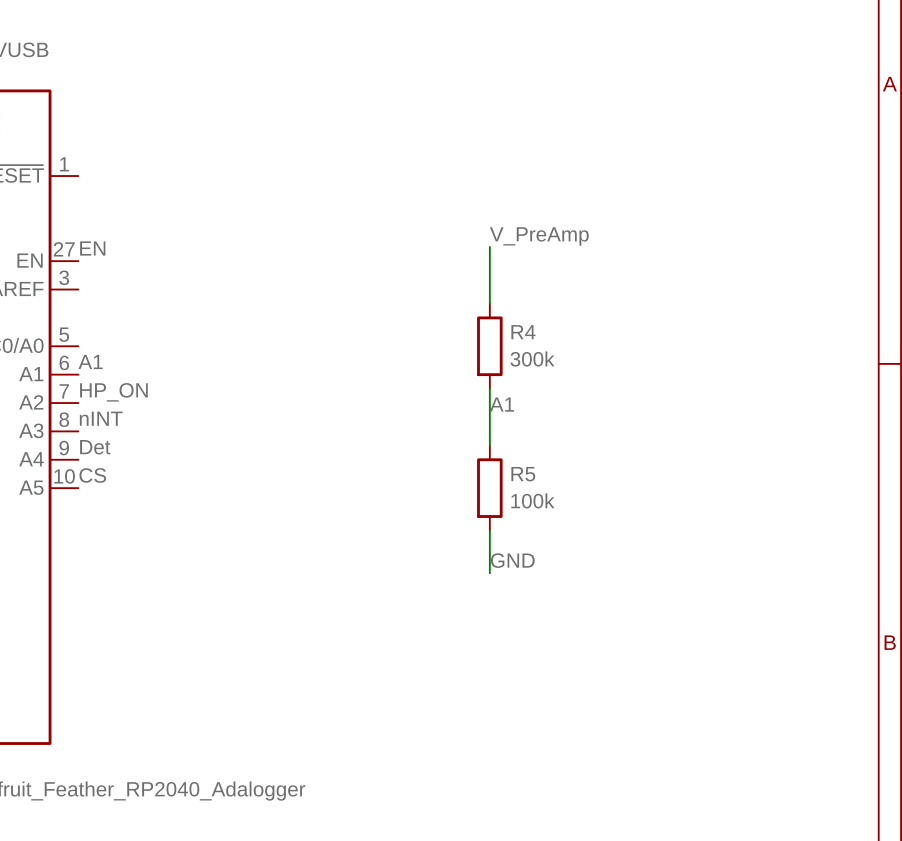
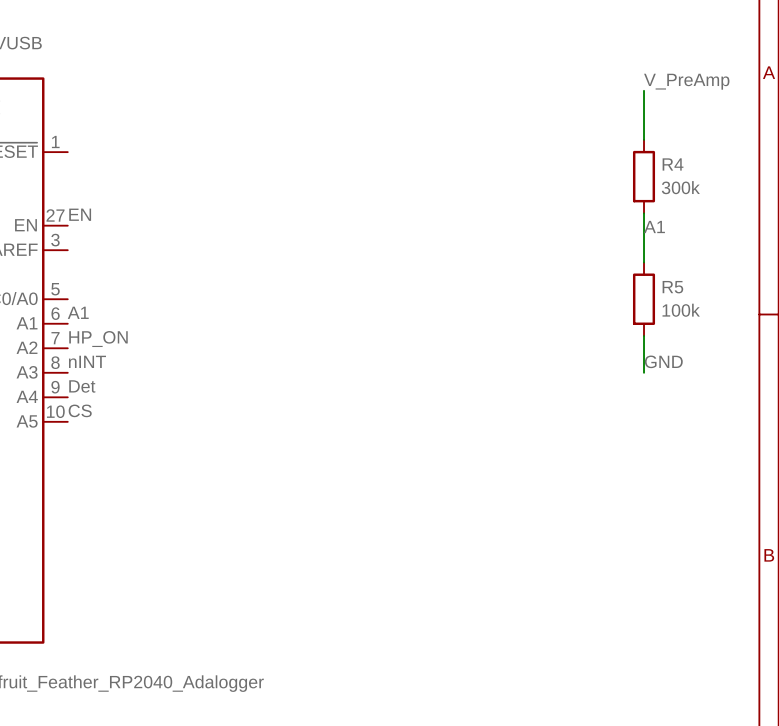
label: none -> V_PreAmp (686, 81)
wire: none -> (644, 90) (644, 139)
label: V_PreAmp (539, 236) -> none
wire: (489, 246) (489, 303) -> (644, 213) (644, 262)
label: none -> A1 (654, 227)
R4 position: (489, 346) -> (644, 176)
wire: (489, 388) (489, 445) -> none
wire: none -> (644, 336) (644, 372)
label: A1 (501, 404) -> none
label: none -> GND (663, 361)
R5 position: (489, 488) -> (644, 299)
wire: (489, 530) (489, 573) -> none
label: GND (512, 560) -> none

